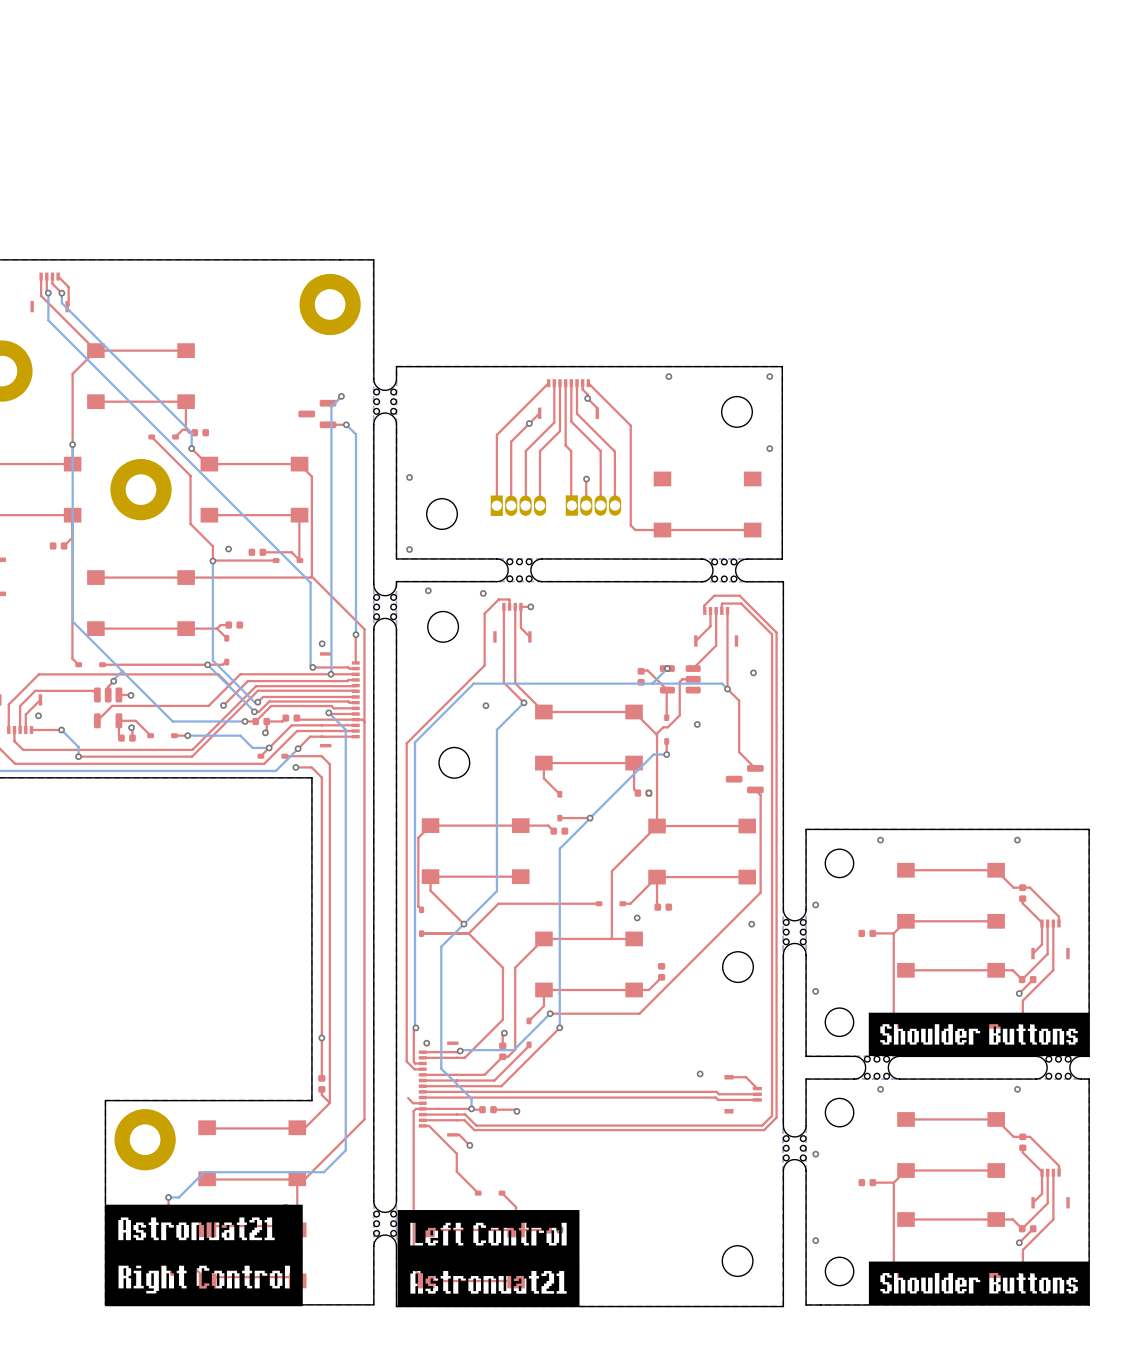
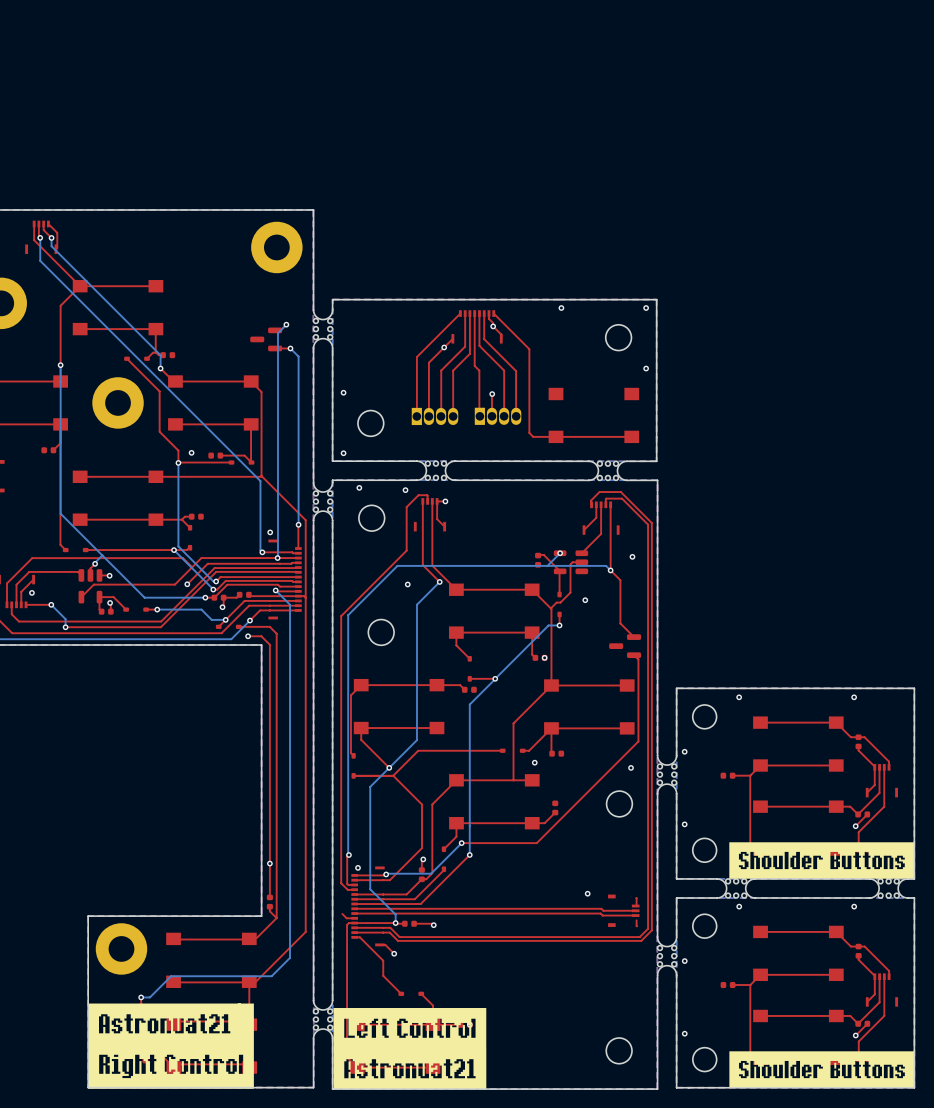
top track: (728, 1077) (746, 1077) (757, 1088) -> none
top track: none -> (636, 898) (636, 906)
top track: none -> (636, 920) (636, 926)

